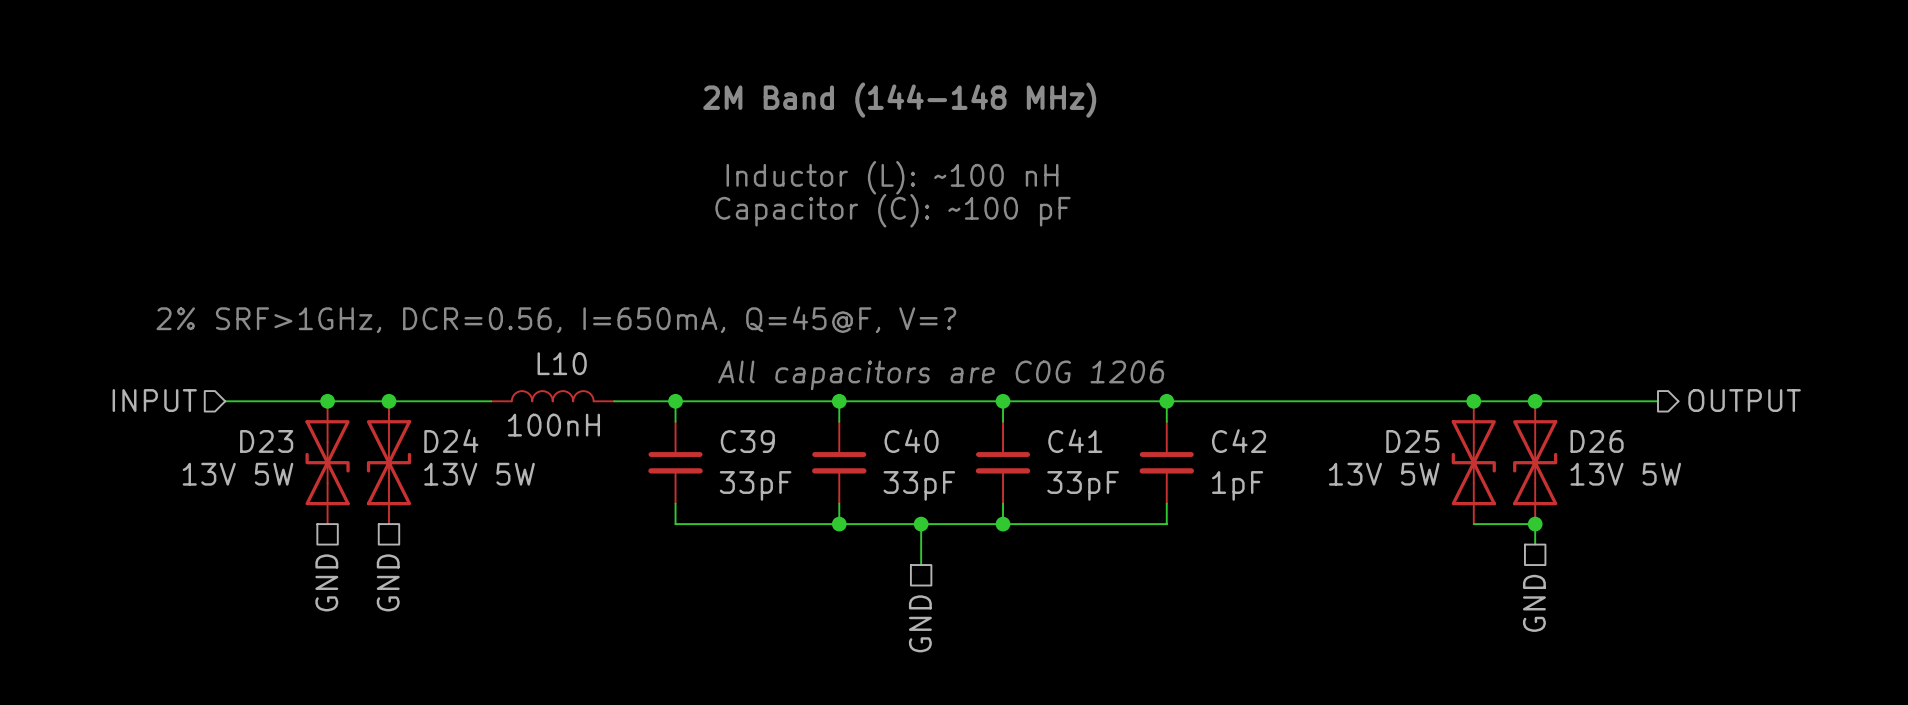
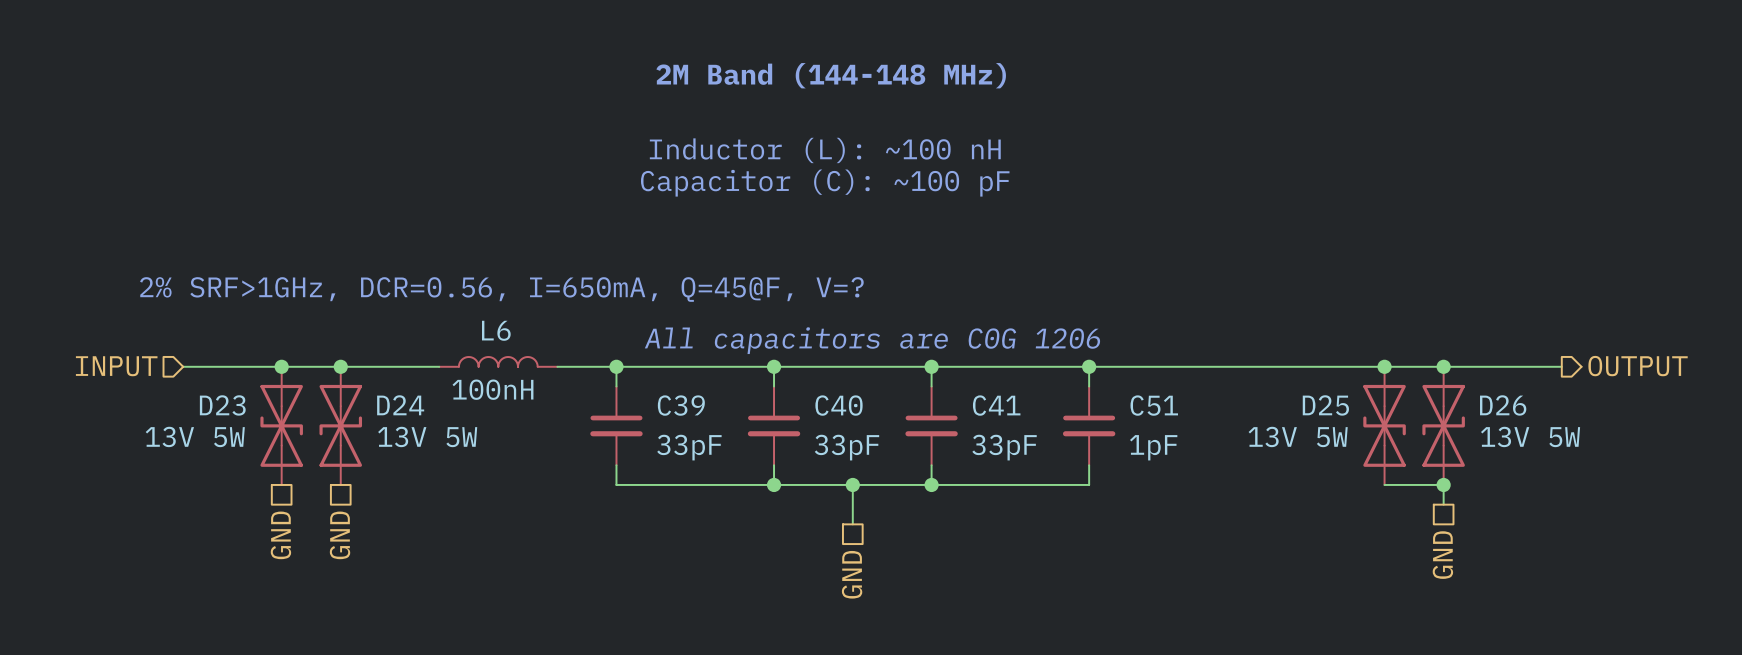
L10 name: L10 (562, 363) -> L6 (496, 330)
C42 name: C42 (1239, 441) -> C51 (1154, 405)

